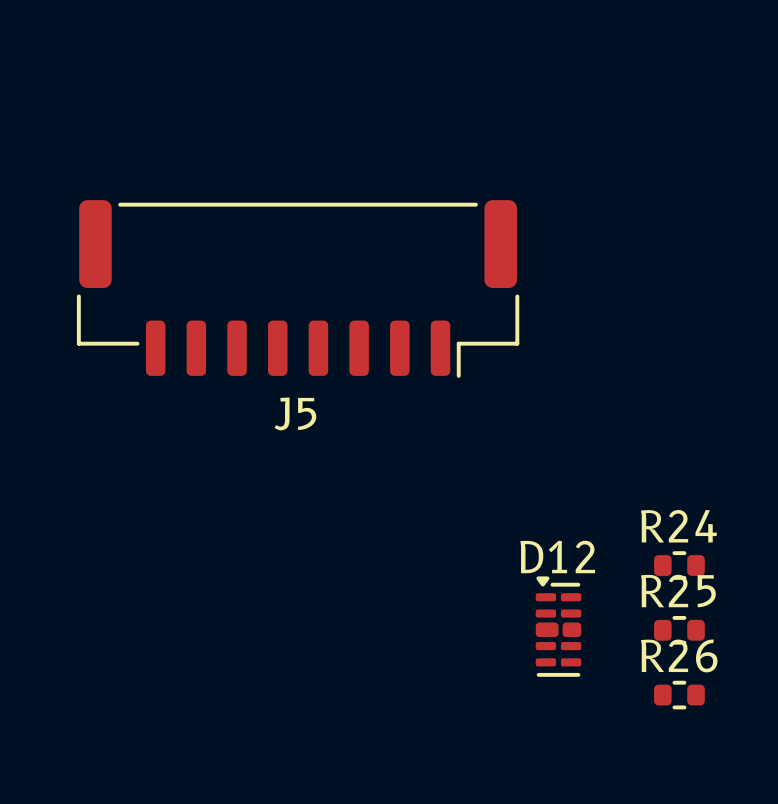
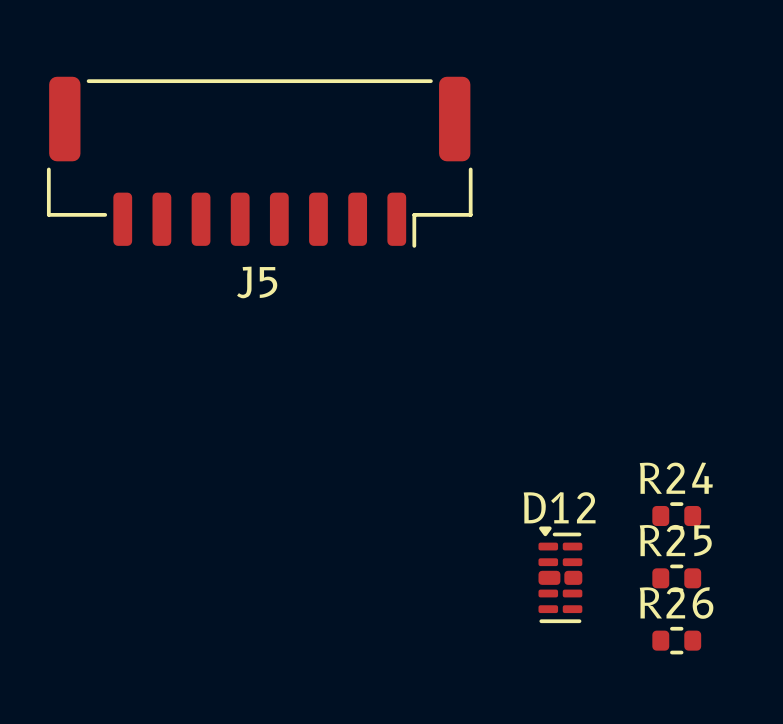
J5 position: (298, 288) -> (259, 162)

